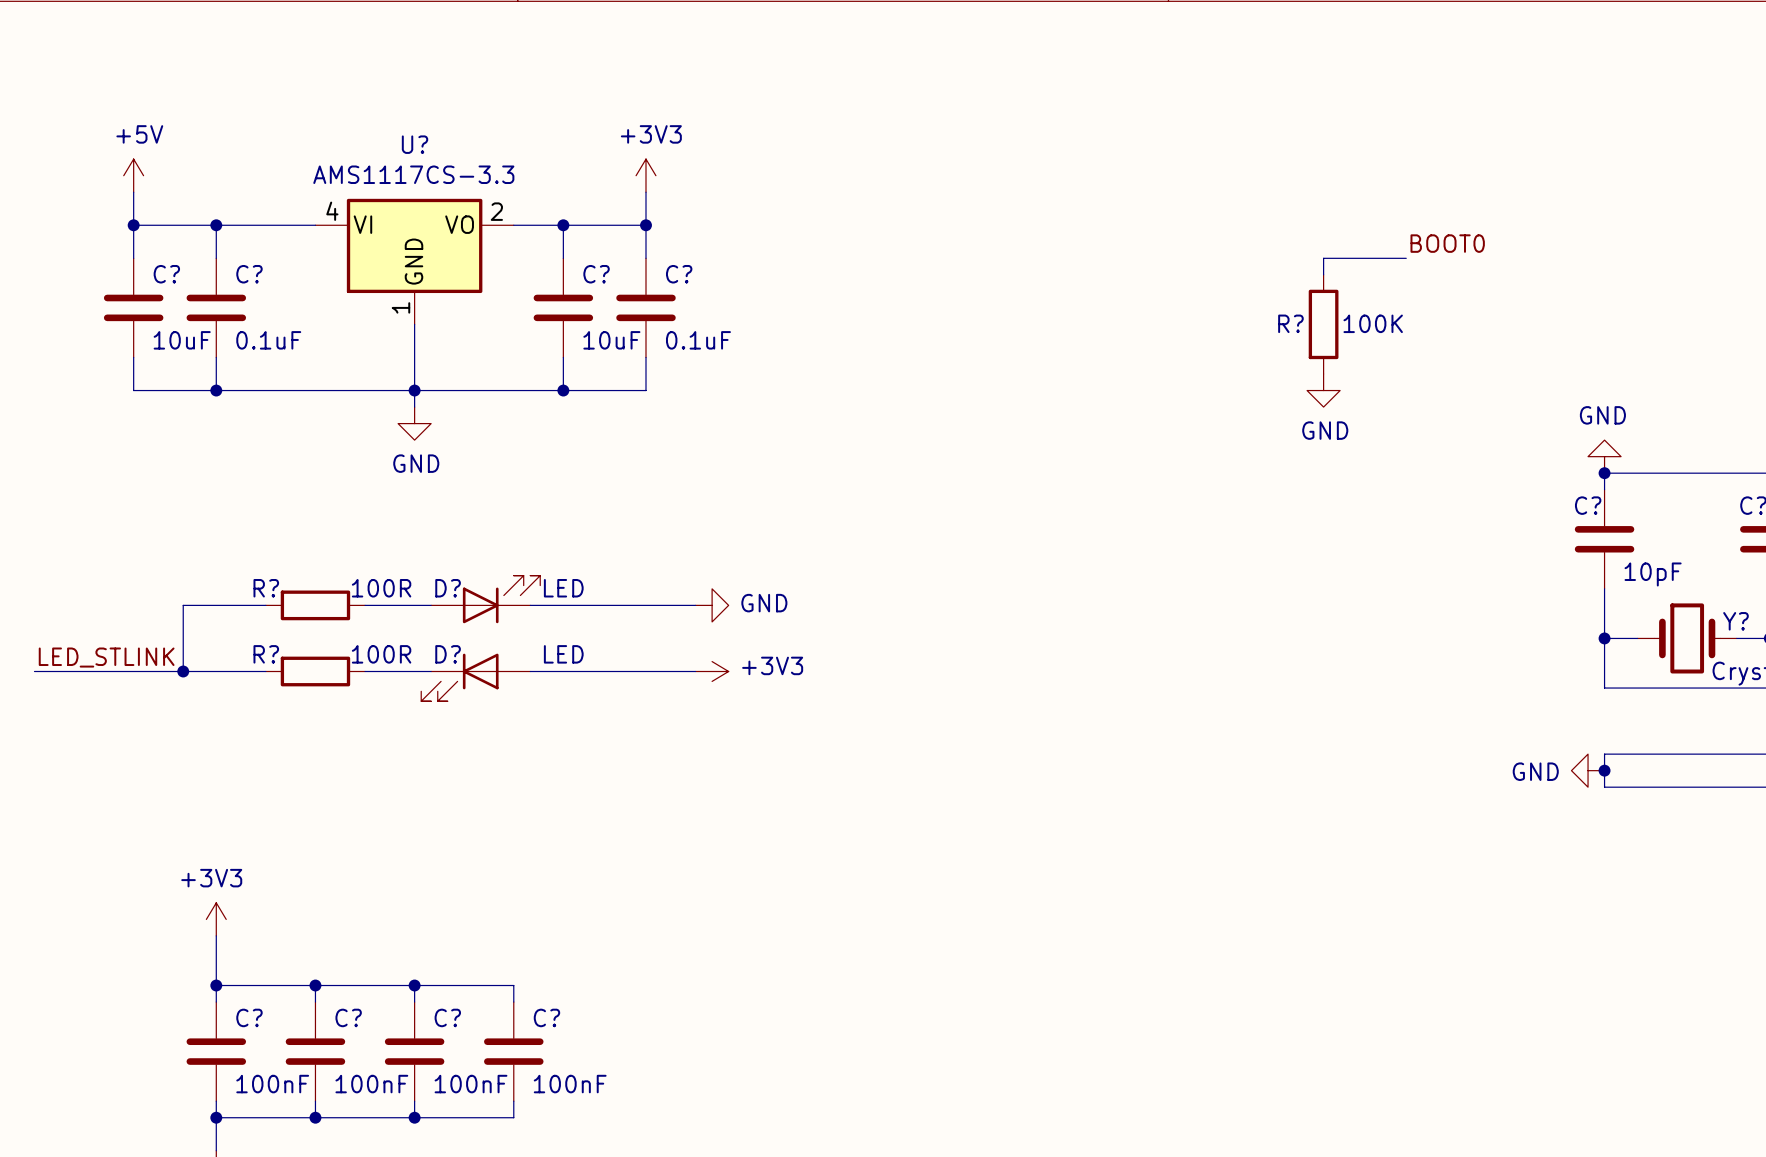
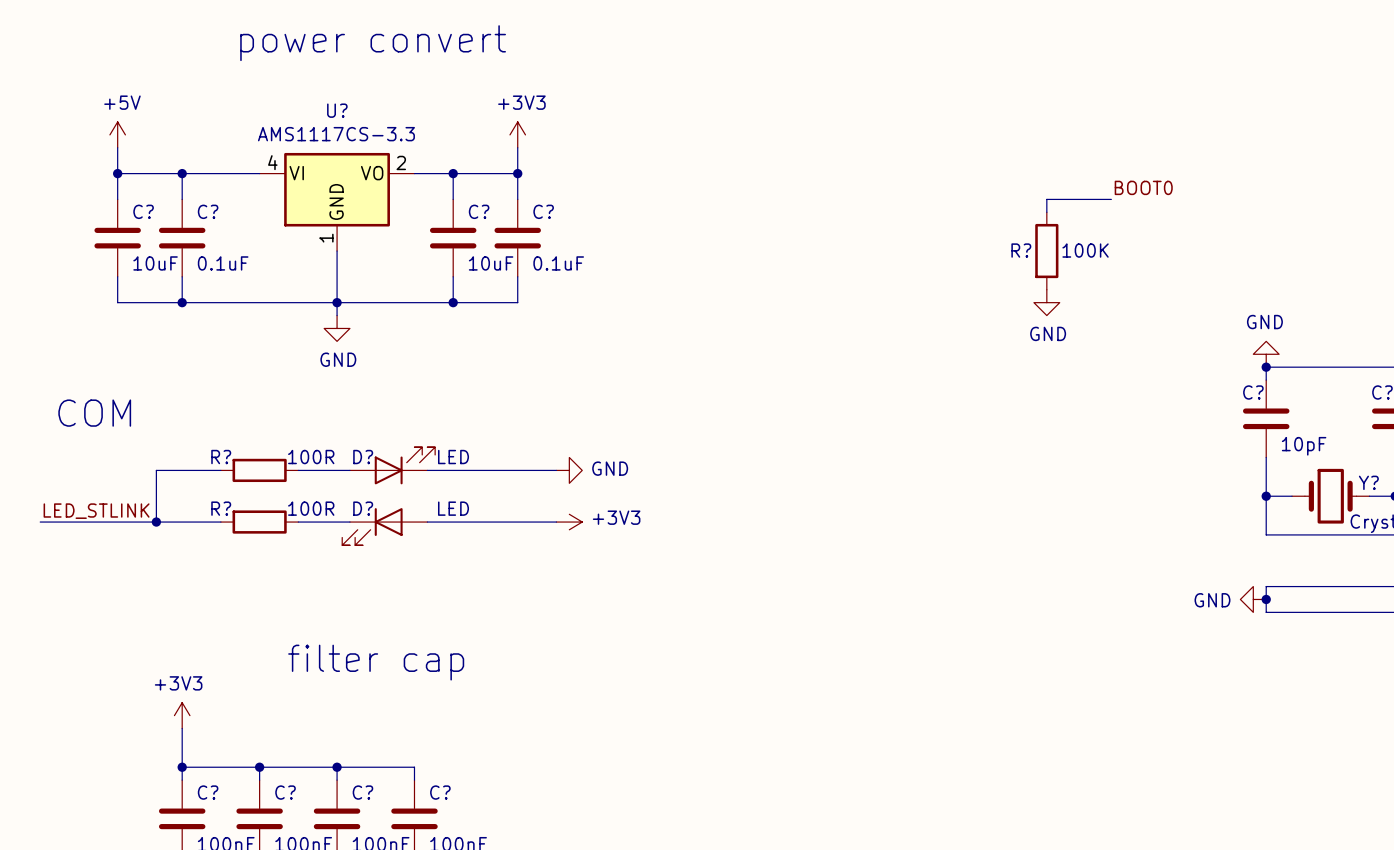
text: none -> power convert (373, 43)
text: none -> COM (94, 413)
text: none -> filter cap (376, 662)

